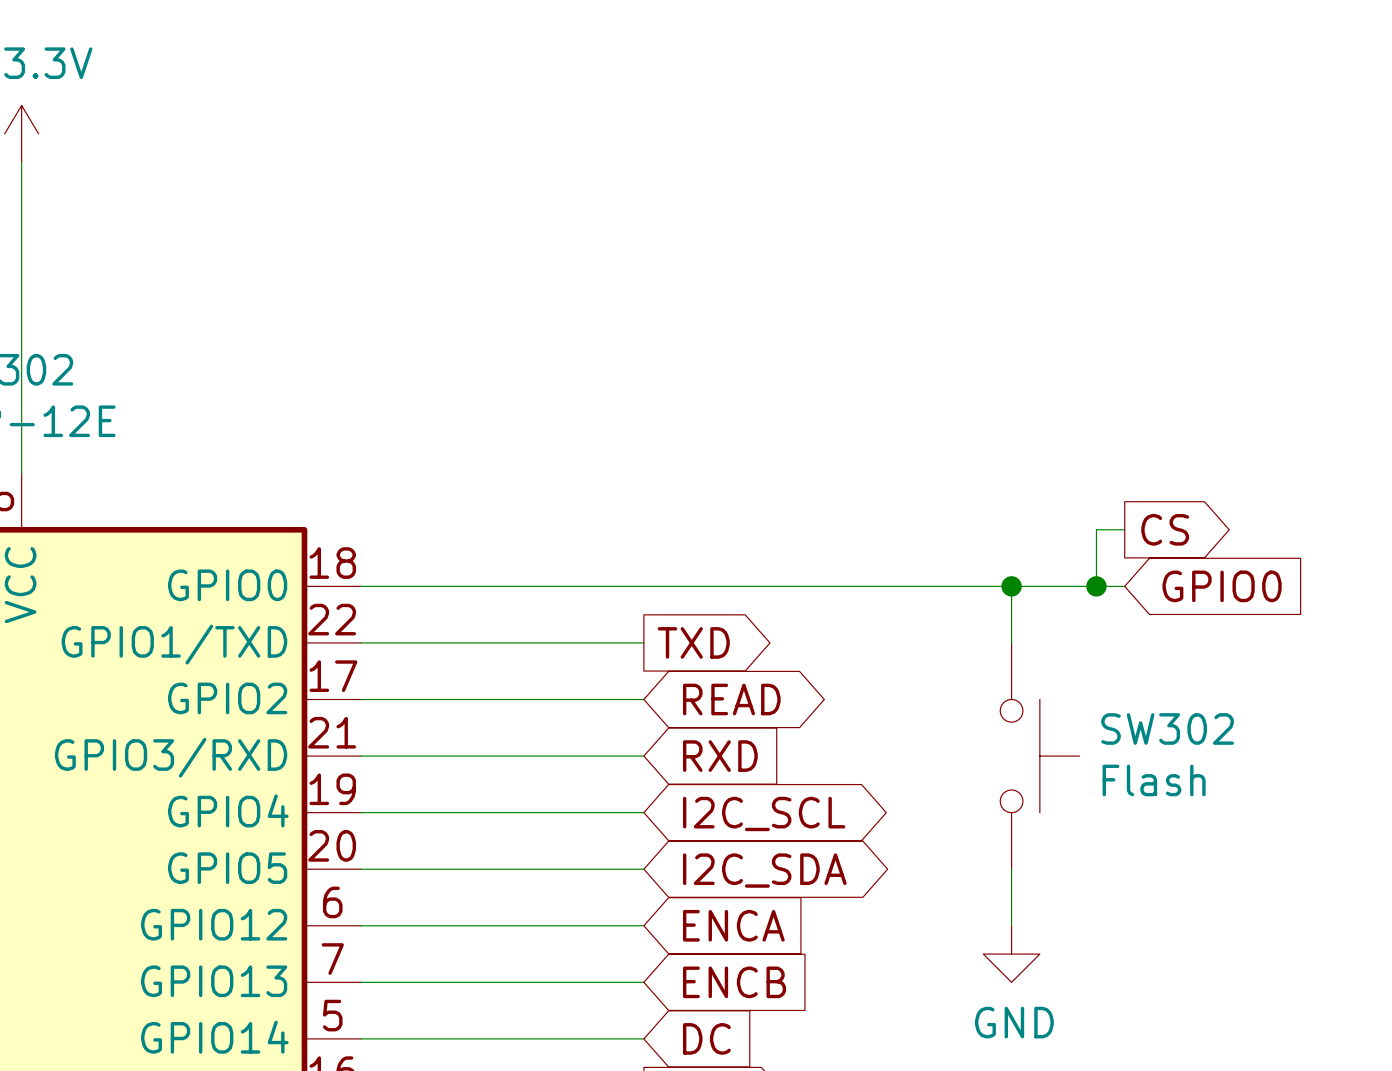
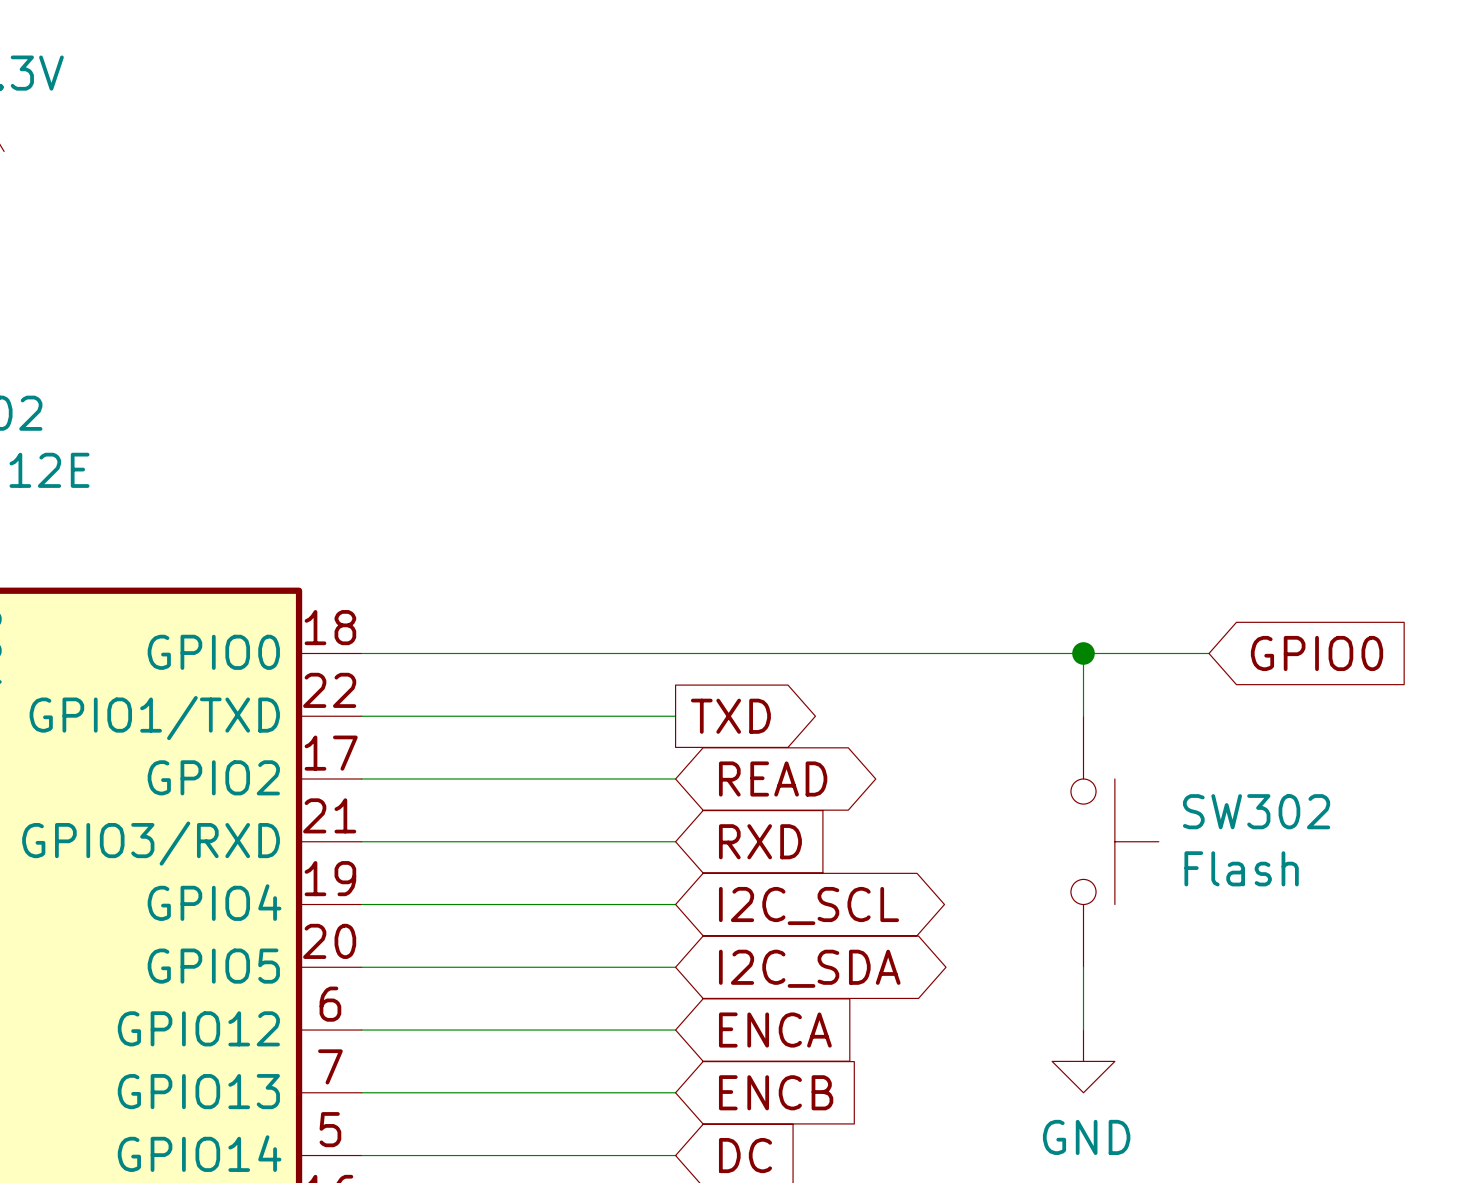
wire: (1124, 529) (1096, 529) (1096, 586) -> none
global label: CS (1165, 529) -> none
junction: (1096, 586) -> none

